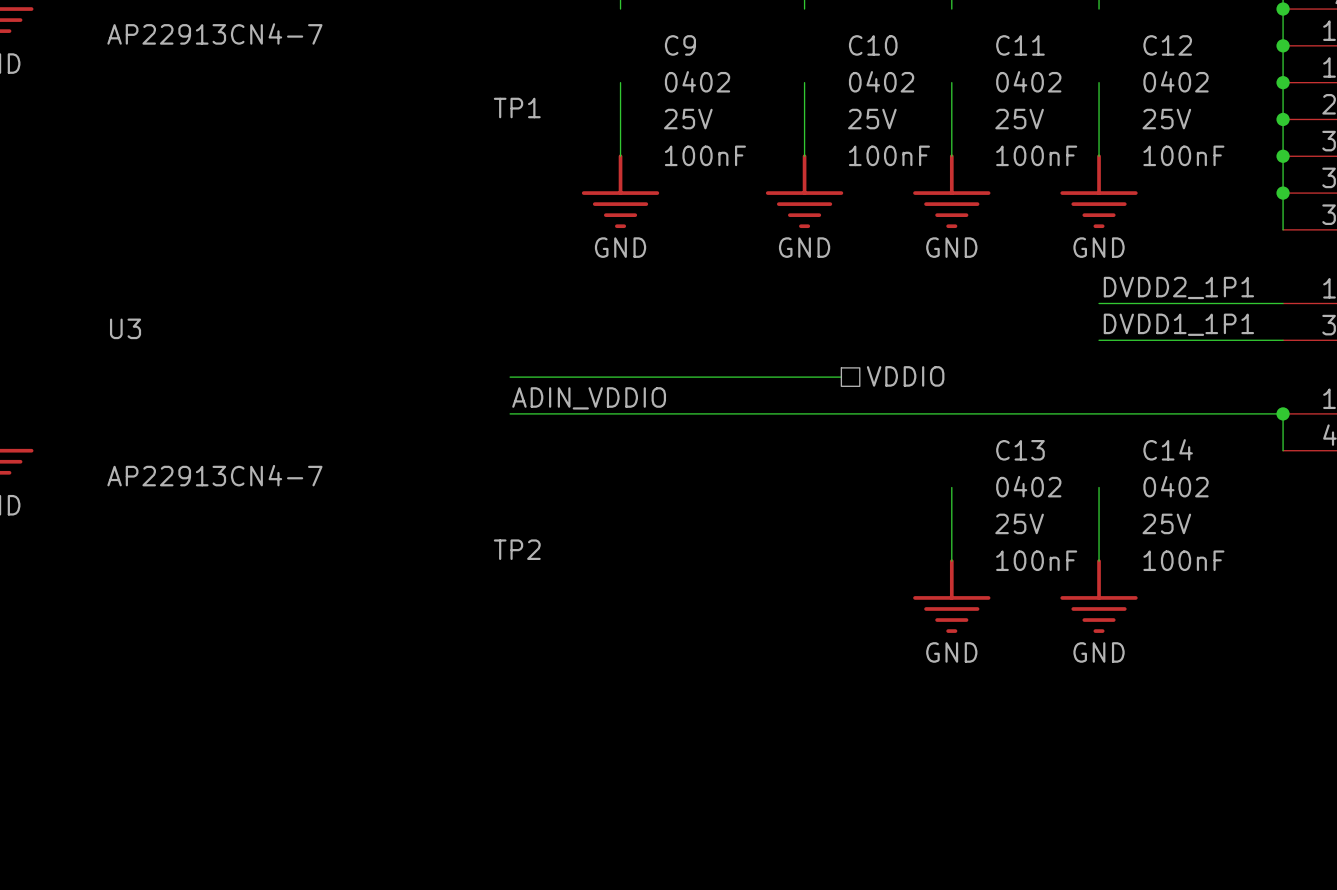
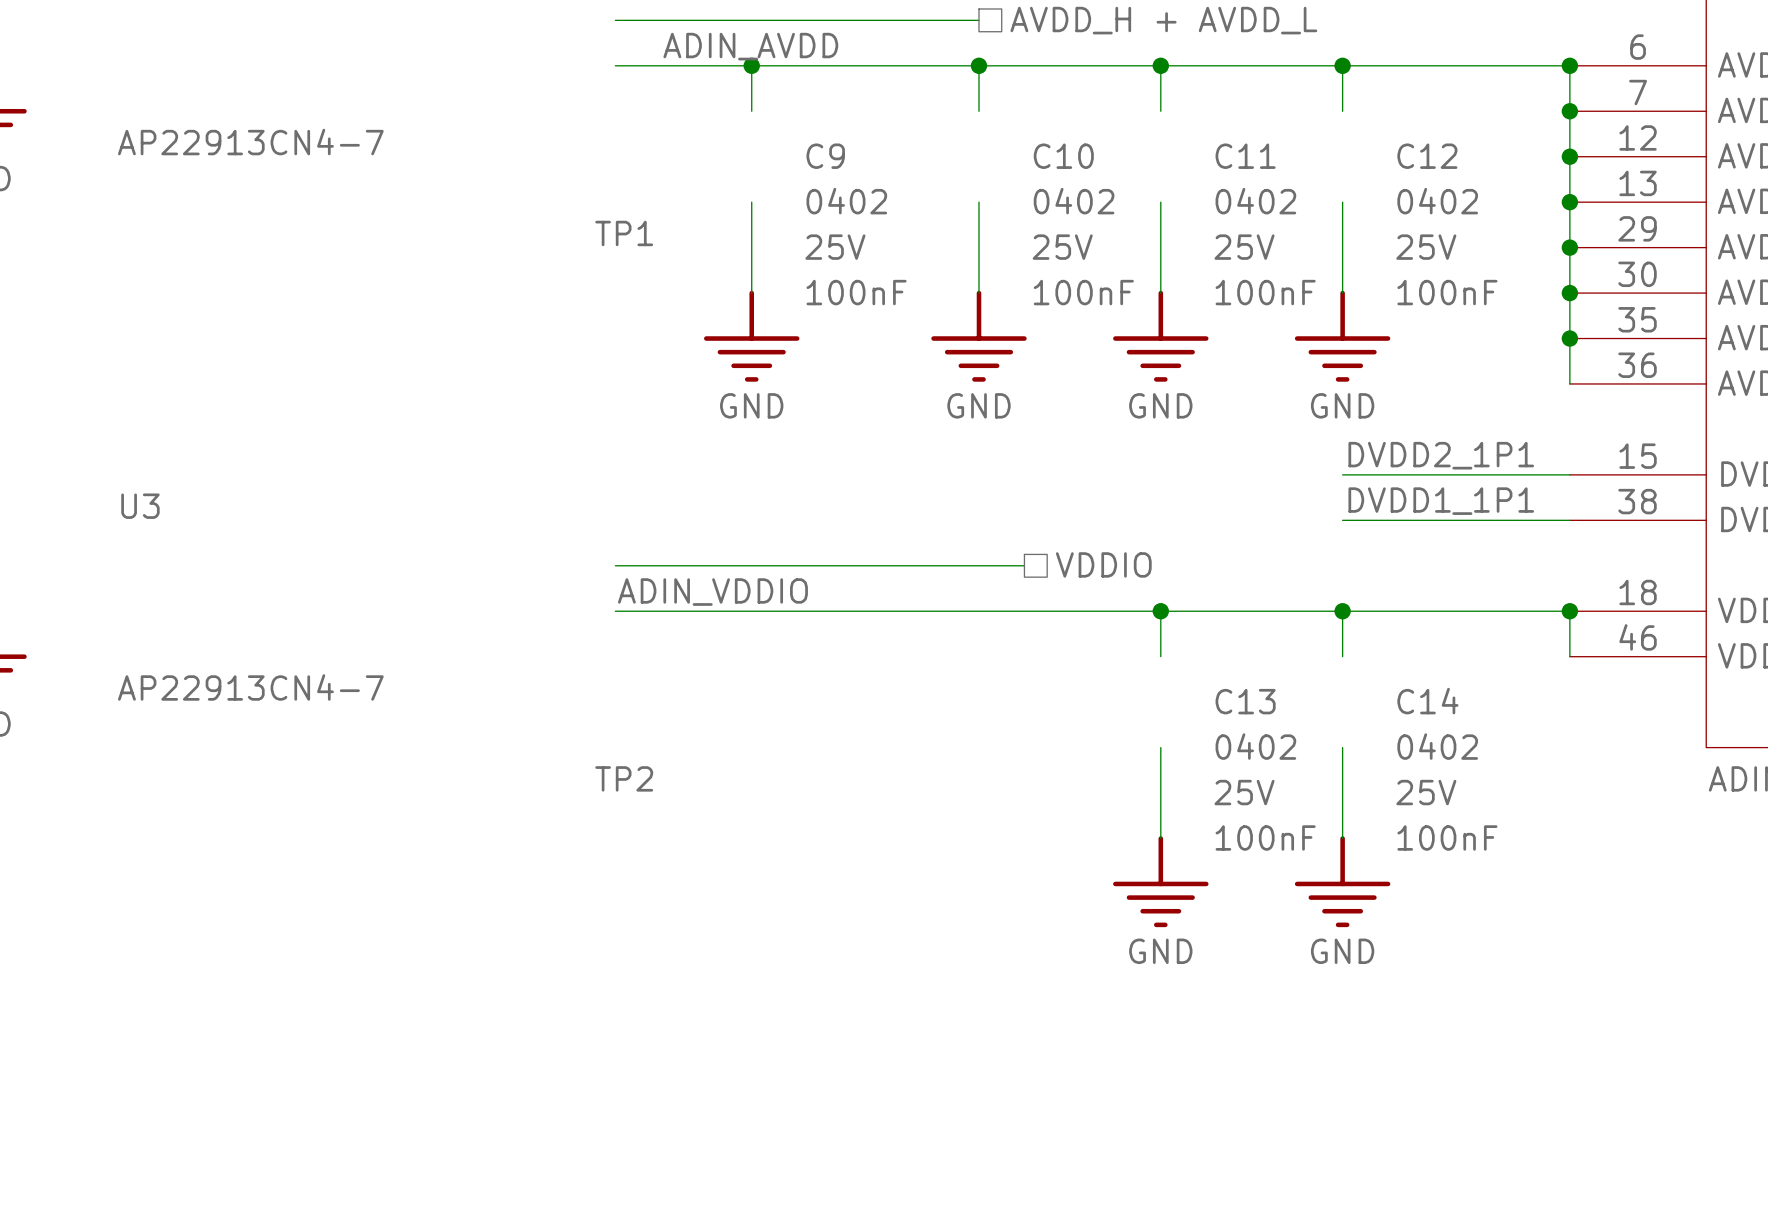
junction: none -> (1160, 611)
junction: none -> (1342, 611)
wire: (951, 487) (951, 524) -> (1160, 611) (1160, 656)
wire: (1099, 487) (1099, 524) -> (1342, 611) (1342, 656)
C13 position: (1036, 505) -> (1265, 769)
C14 position: (1183, 505) -> (1446, 769)
power symbol position: GND (951, 596) -> GND (1160, 881)
power symbol position: GND (1099, 596) -> GND (1342, 881)

